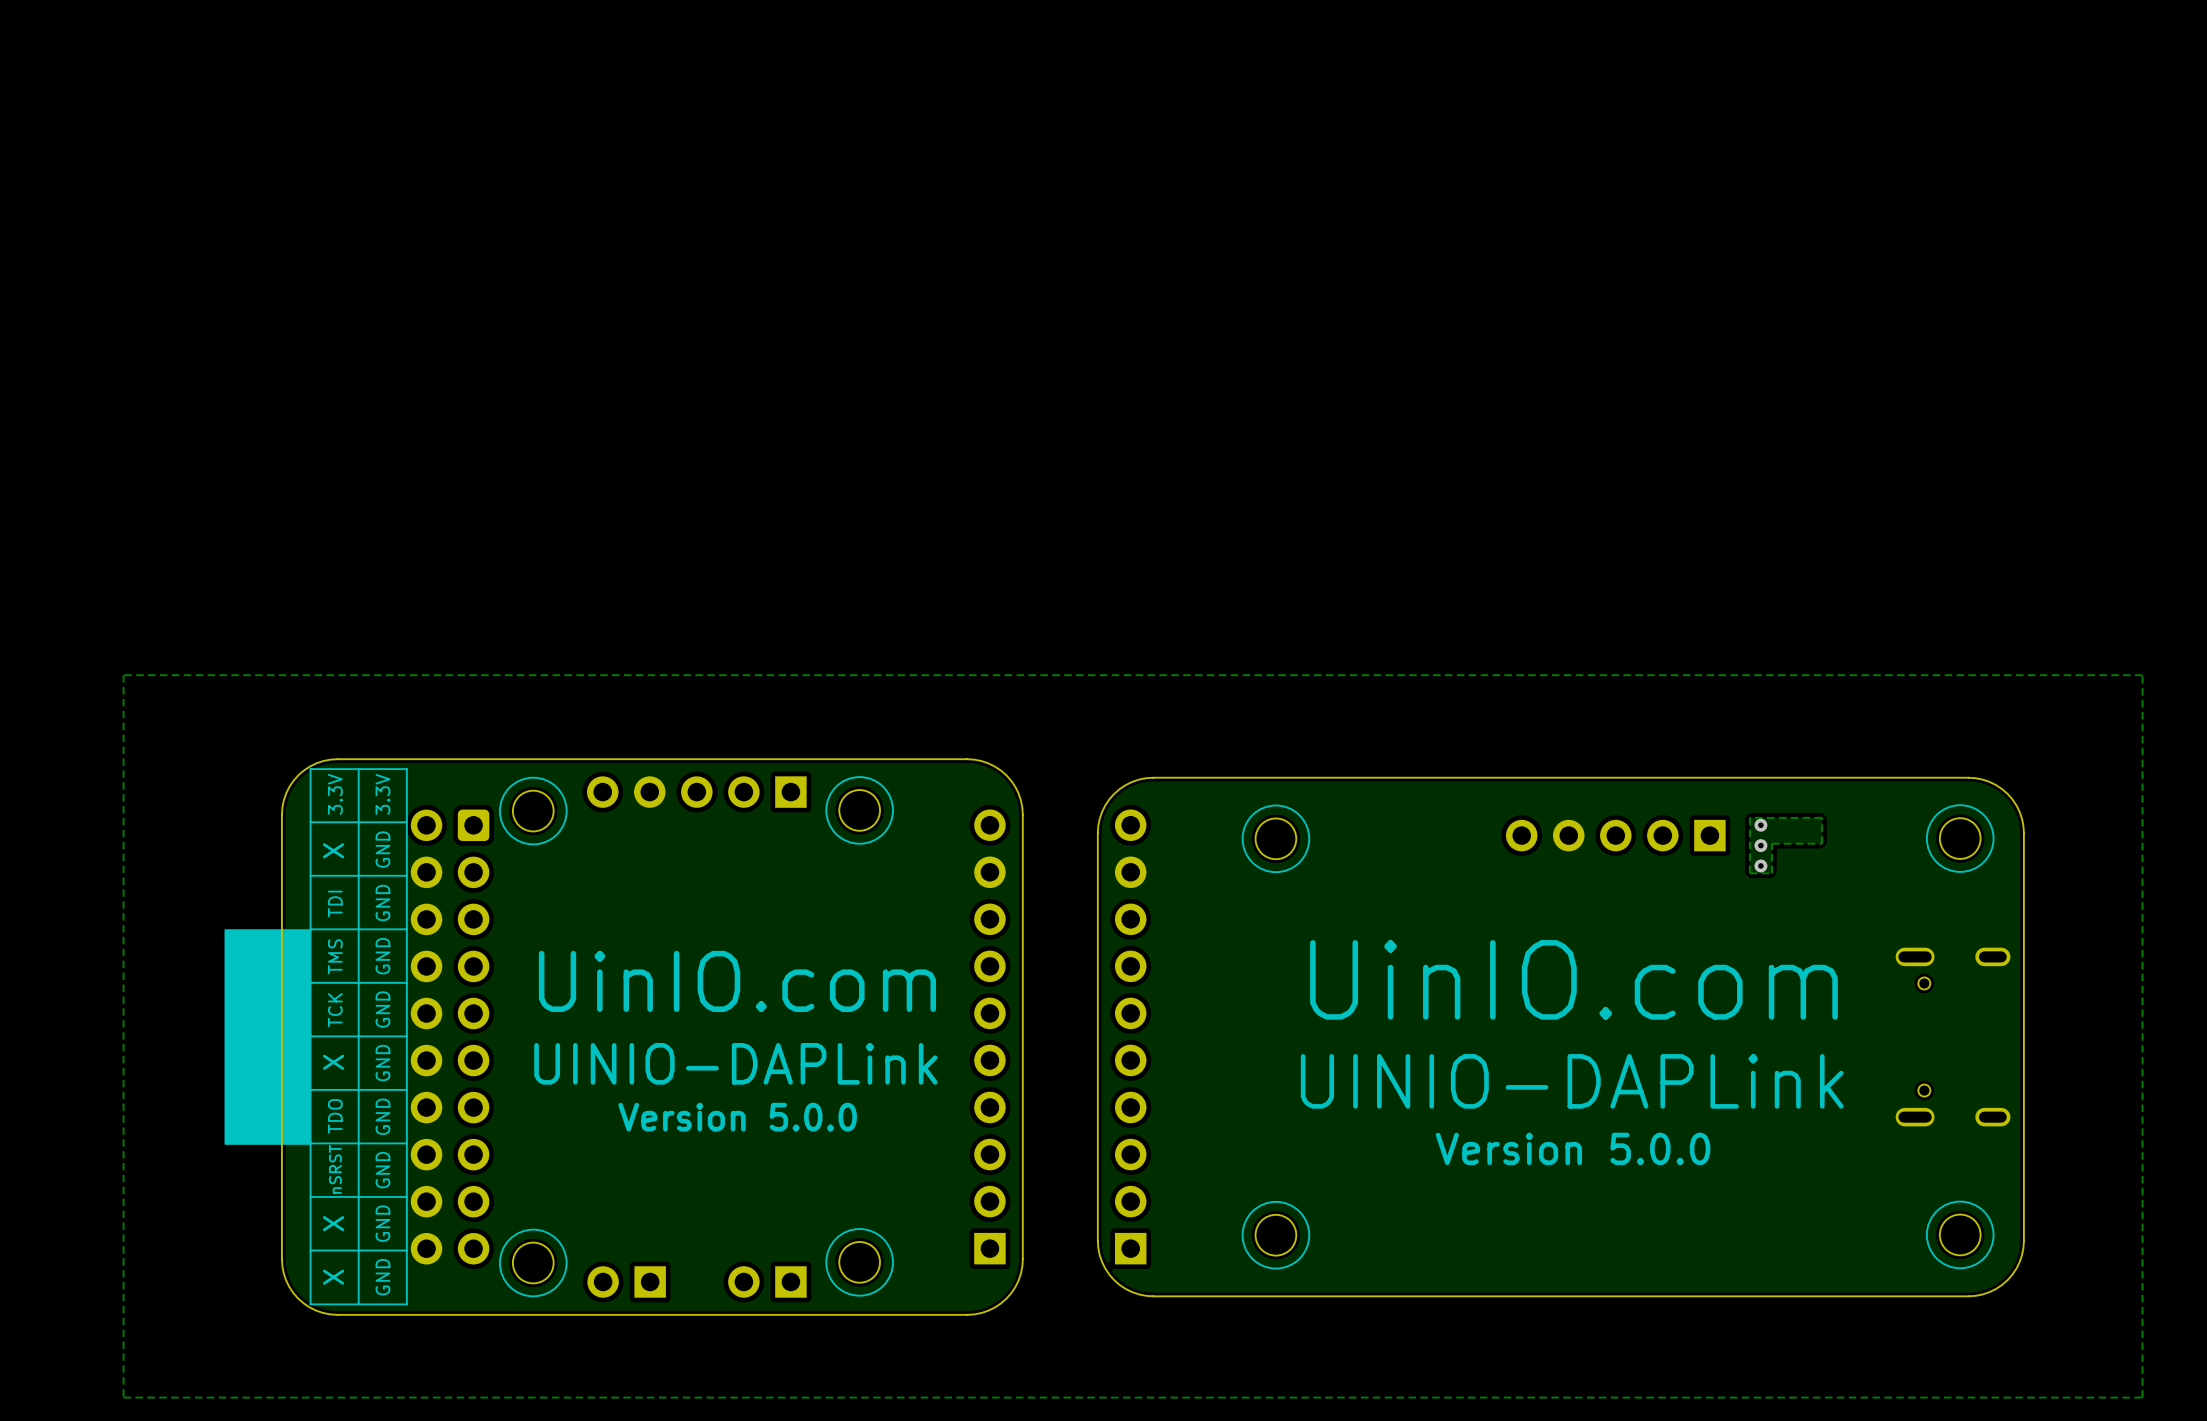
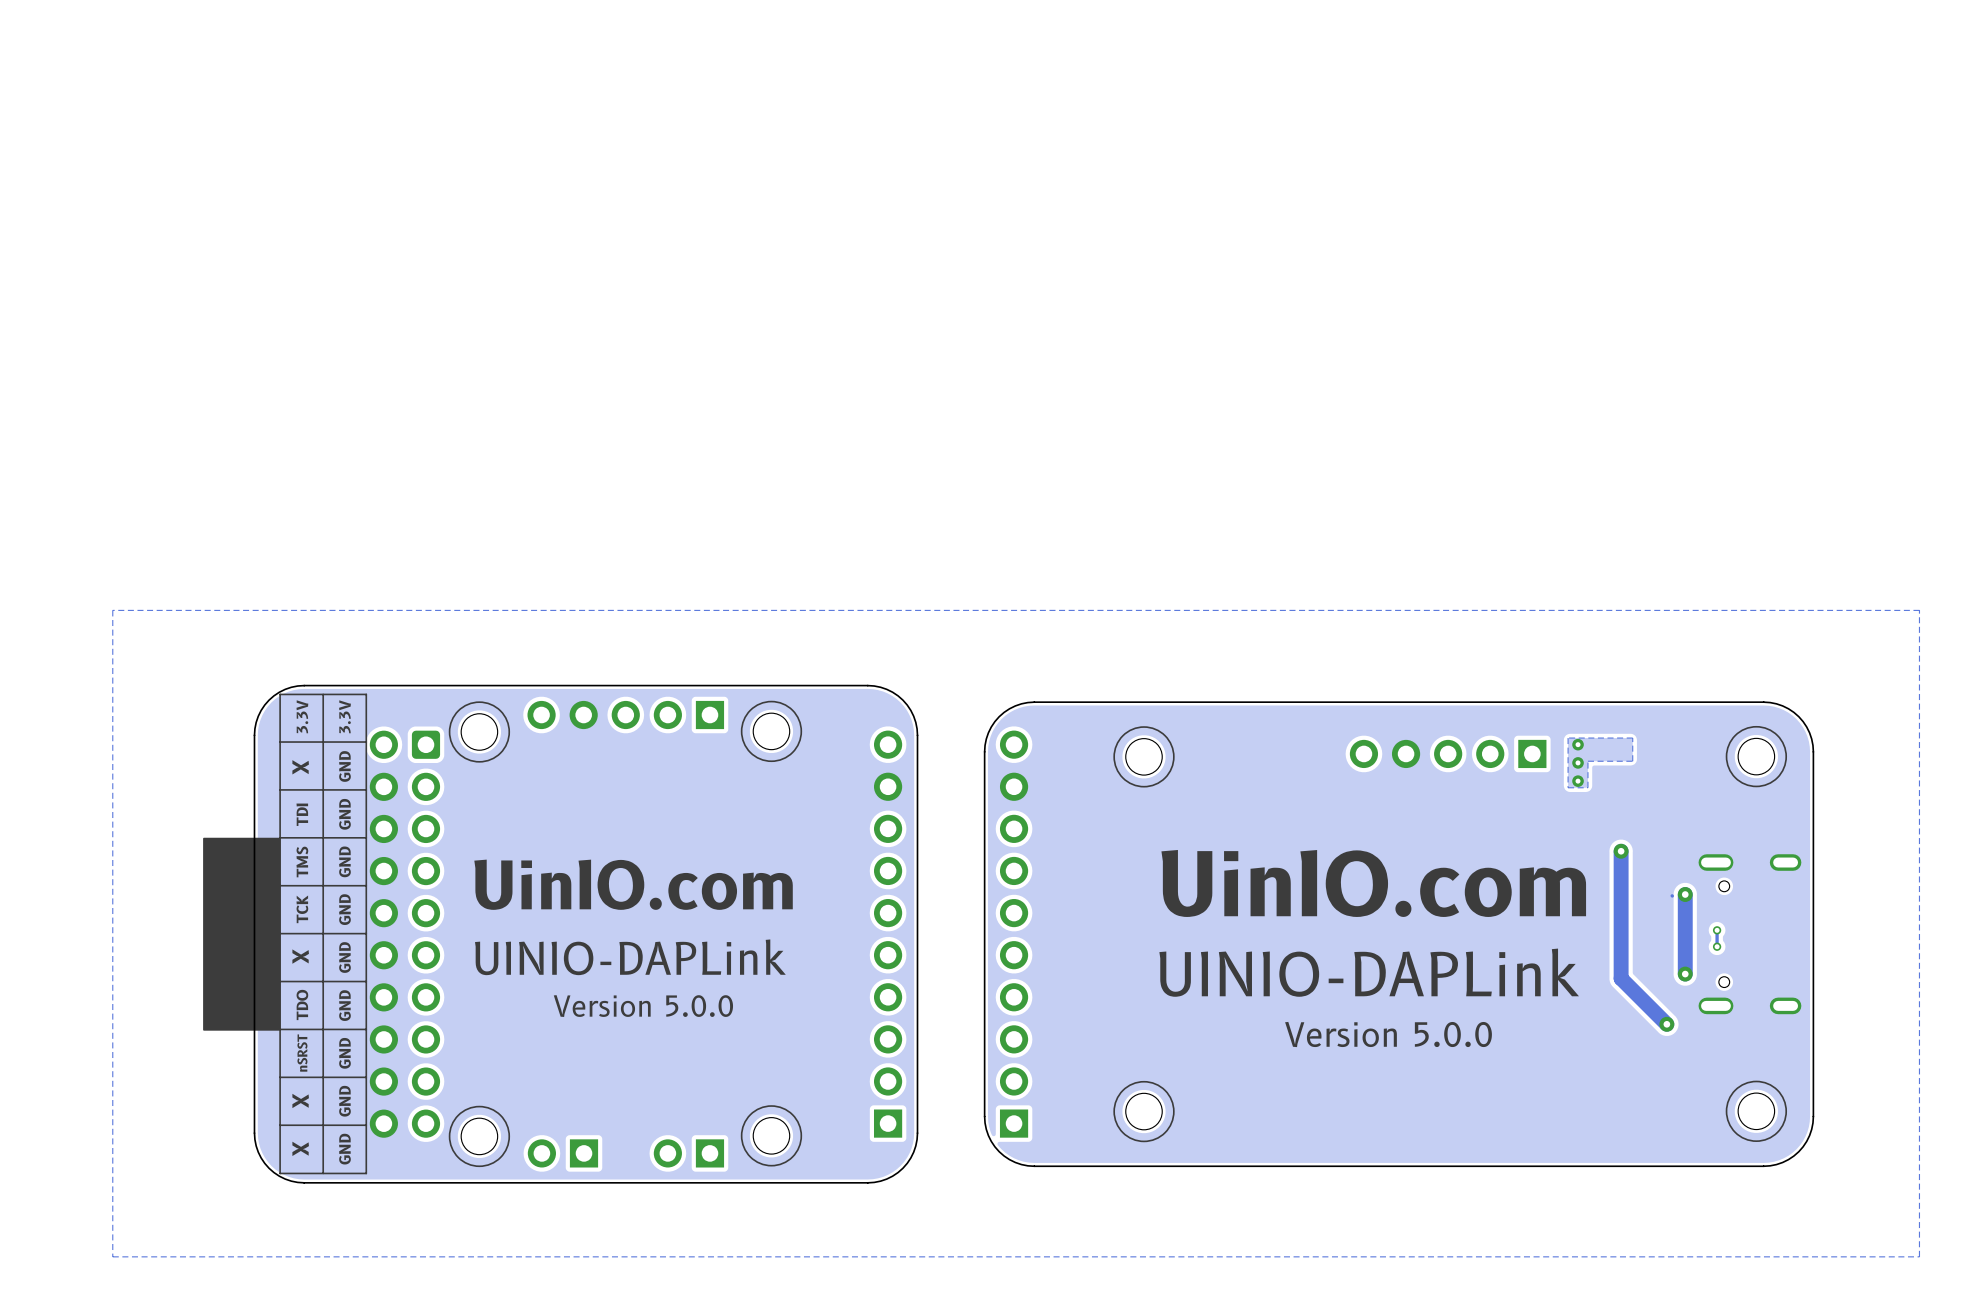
track: none -> (1621, 851) (1621, 978) (1666, 1024)
via: none -> (1621, 851)
track: none -> (1685, 894) (1685, 974)
via: none -> (1685, 894)
track: none -> (1717, 930) (1717, 946)
via: none -> (1717, 930)
via: none -> (1717, 946)
via: none -> (1685, 974)
via: none -> (1666, 1024)

